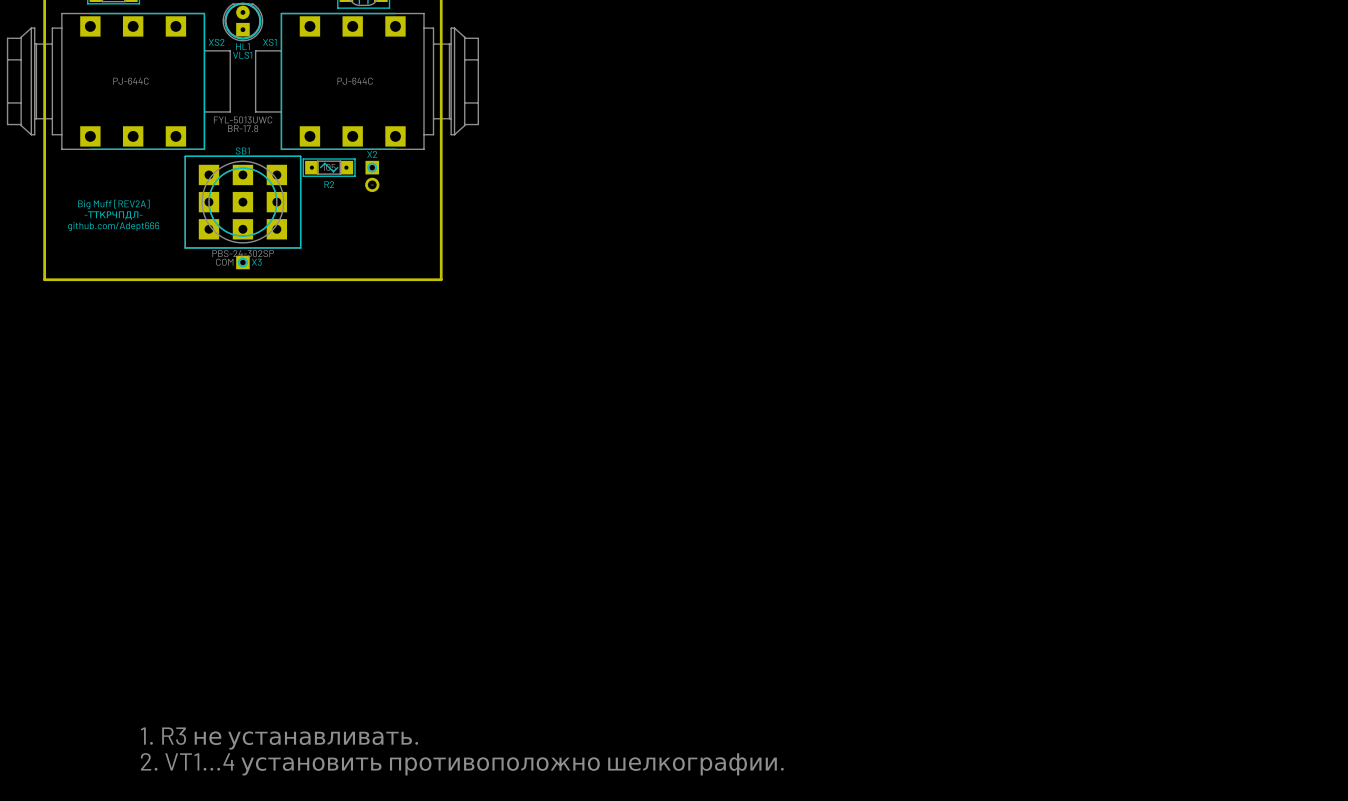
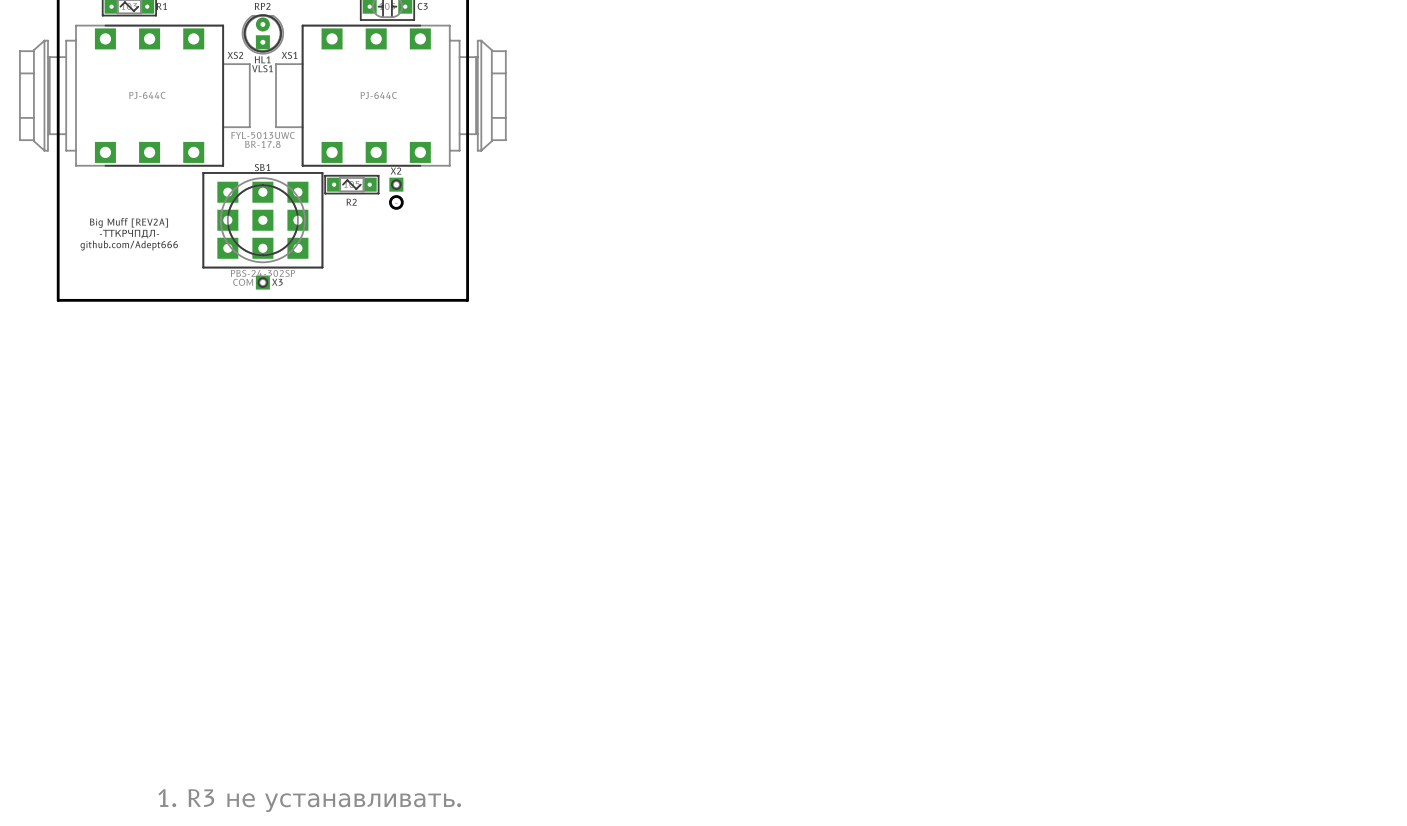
text: 1. R3 не устанавливать. (279, 738) -> none
text: 2. VT1...4 установить противоположно шелкографии. (462, 764) -> 1. R3 не устанавливать. (309, 800)

